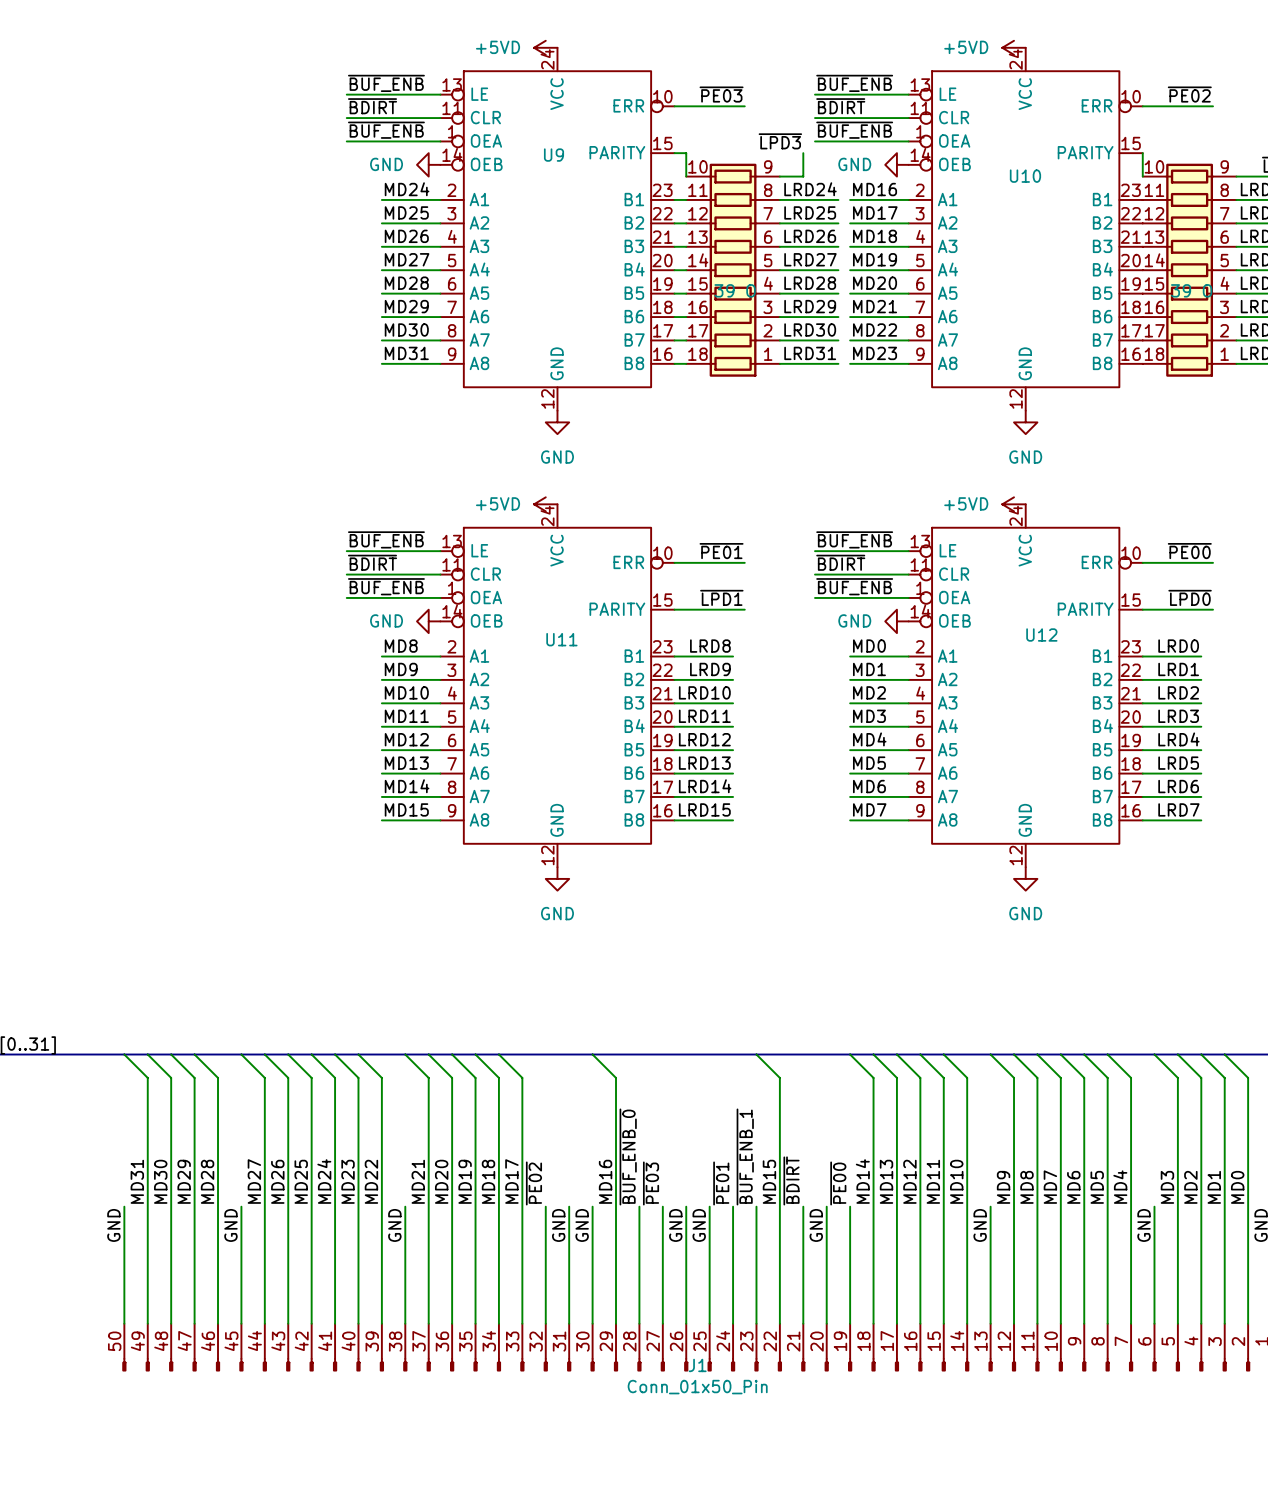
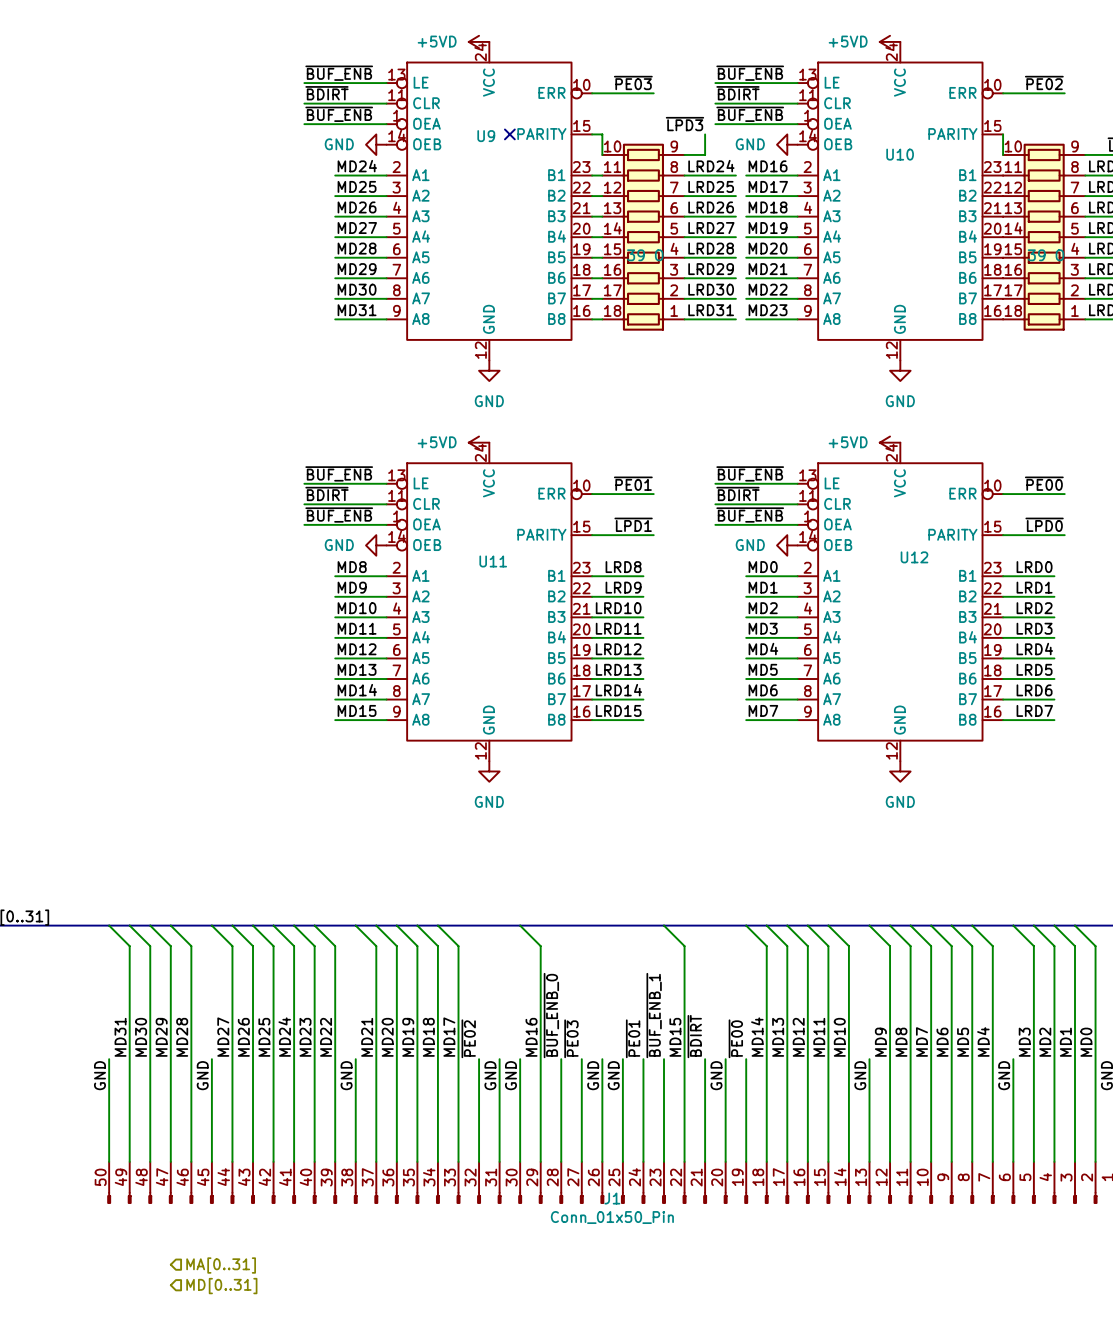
no-connect mark: none -> (509, 134)
hierarchical label: none -> MA[0..31] (221, 1265)
hierarchical label: none -> MD[0..31] (221, 1286)

